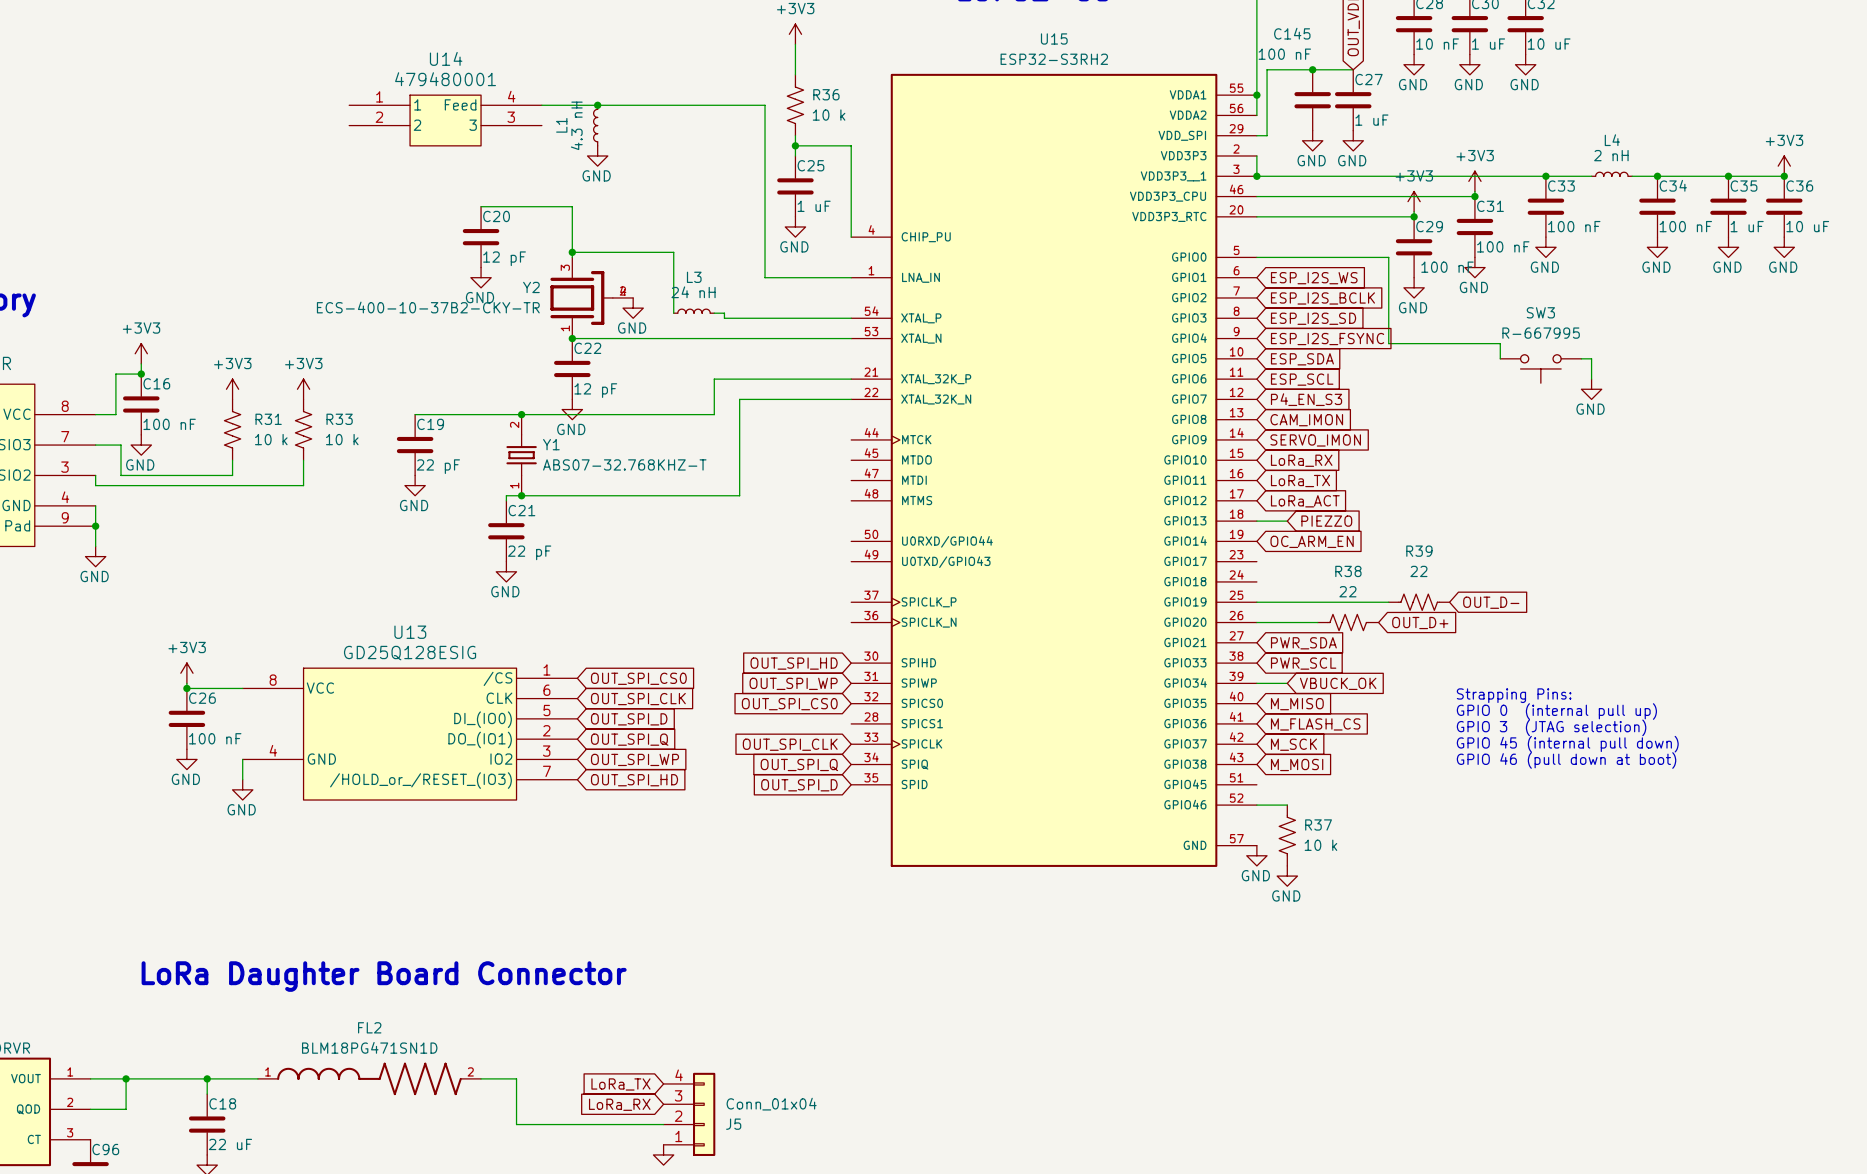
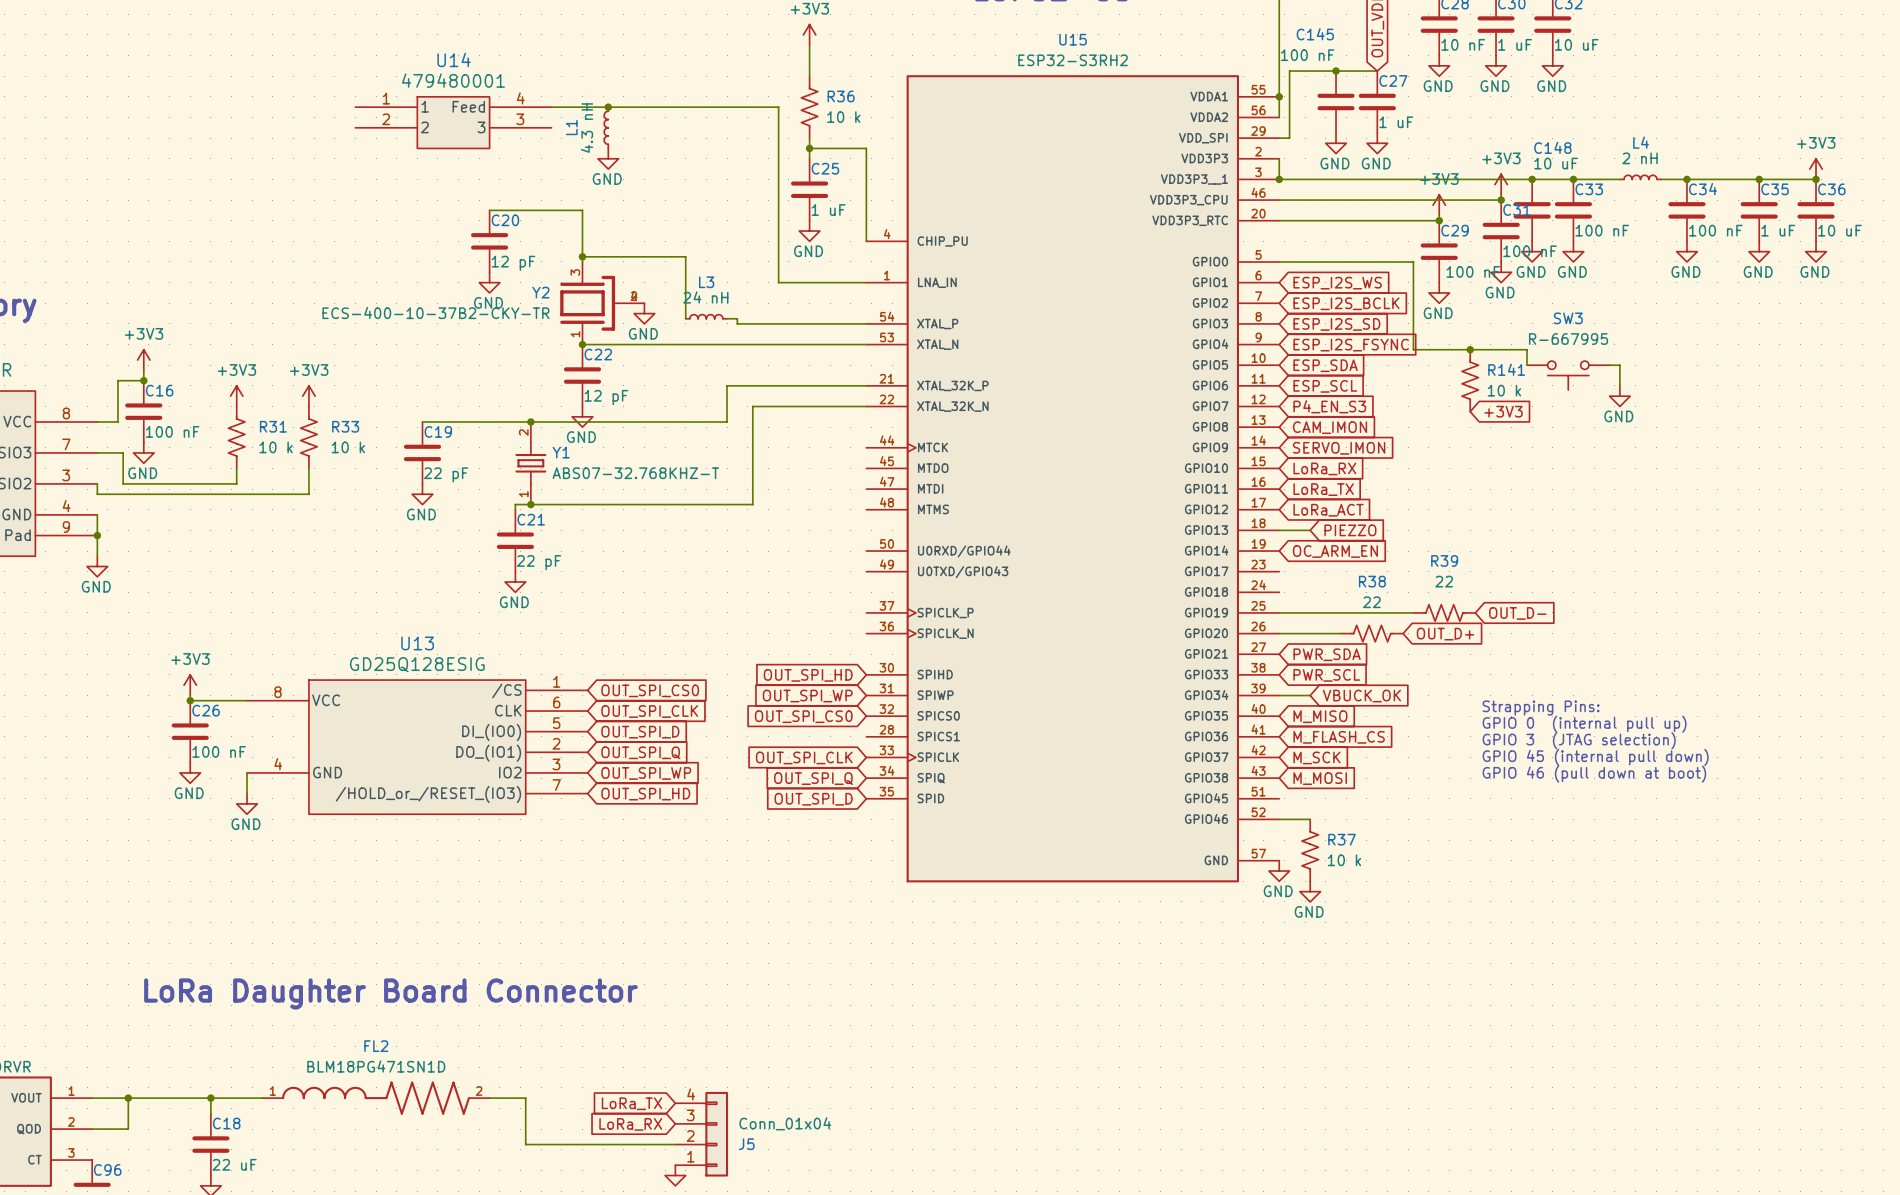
junction: none -> (1532, 179)
C148: none -> 10 uF (1532, 210)
power symbol: none -> GND (1532, 251)
junction: none -> (1470, 349)
R141: none -> 10 k (1470, 380)
global label: none -> +3V3 (1503, 411)

